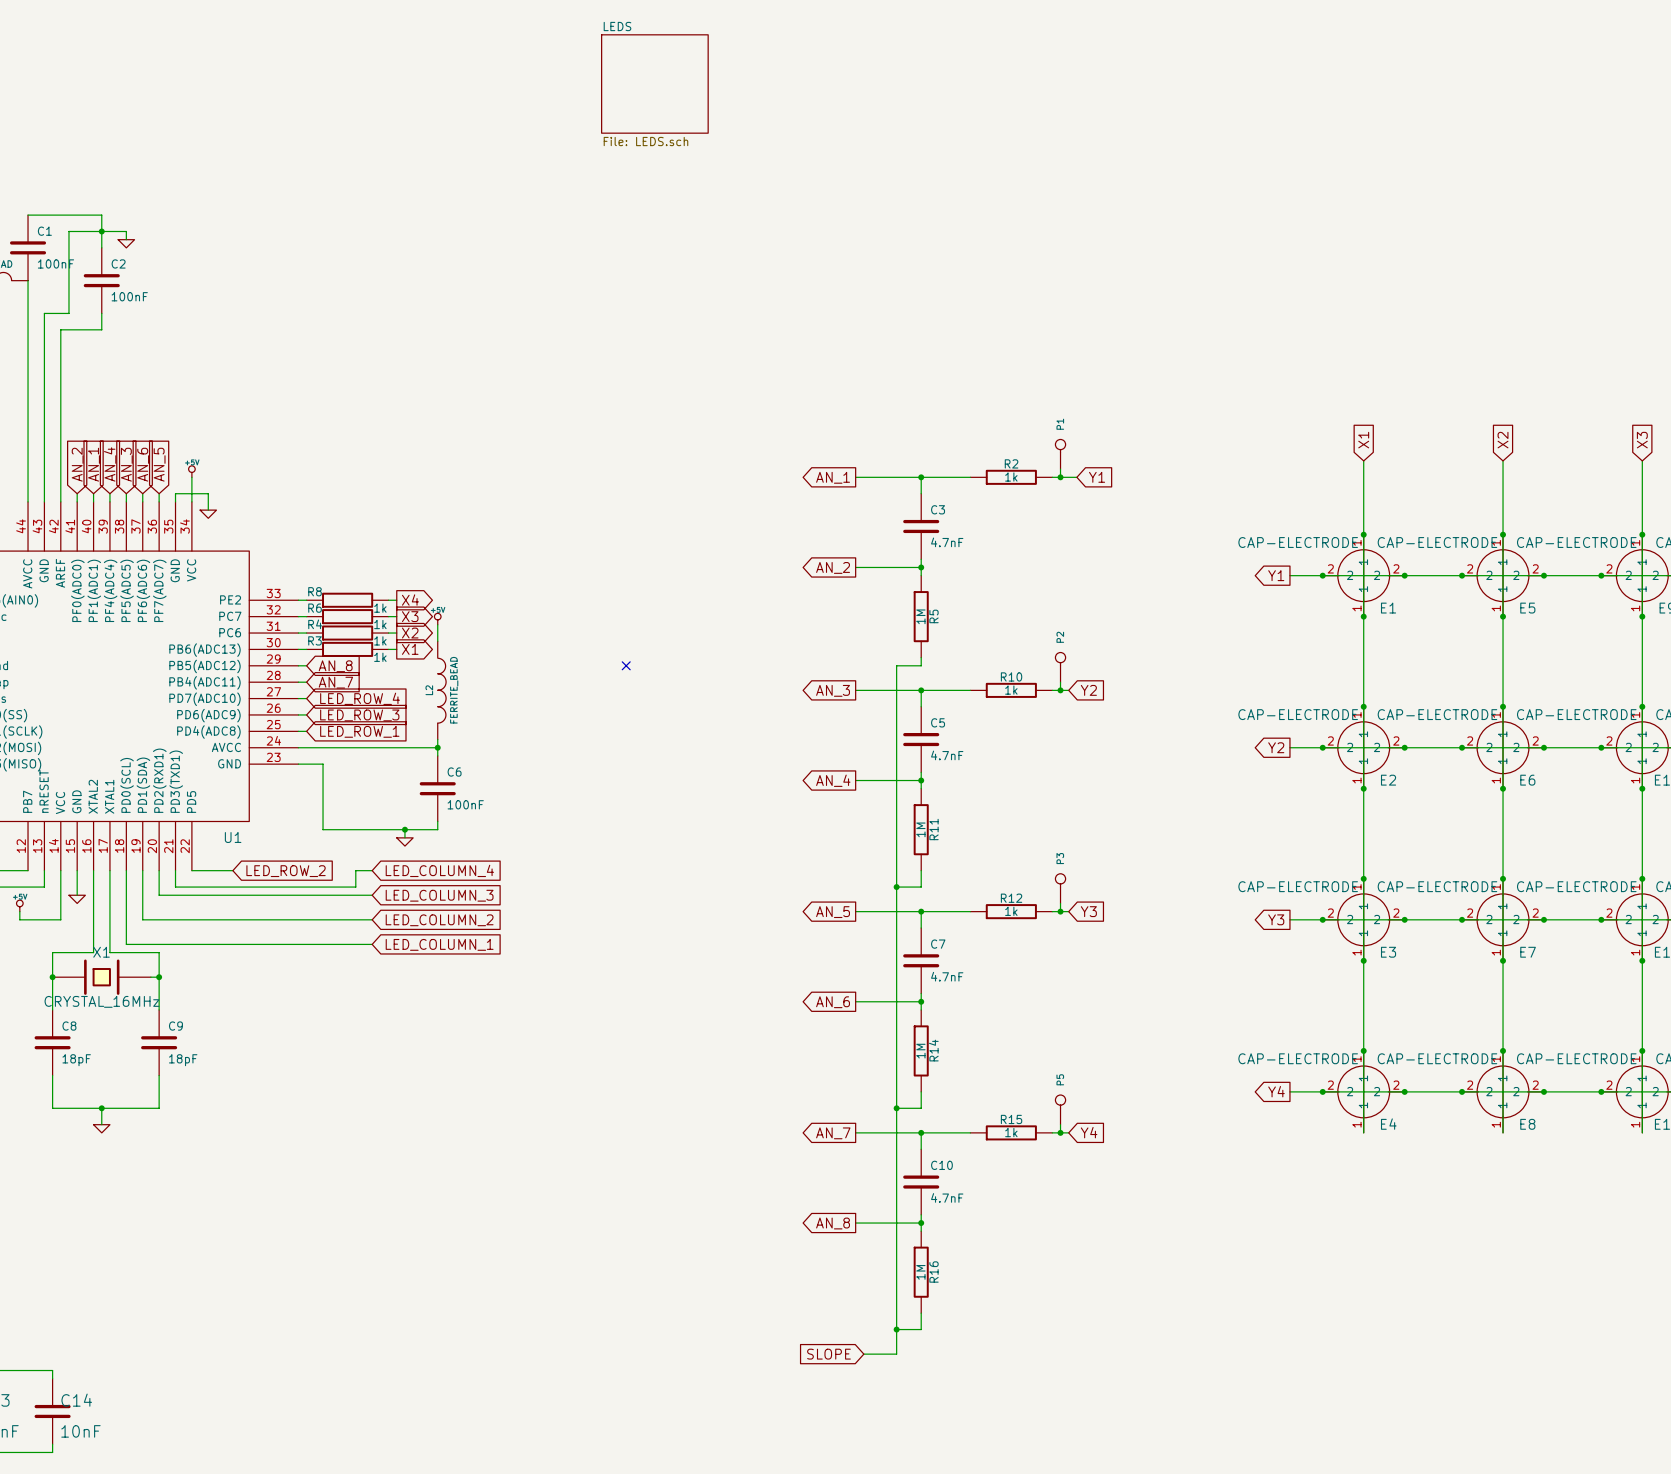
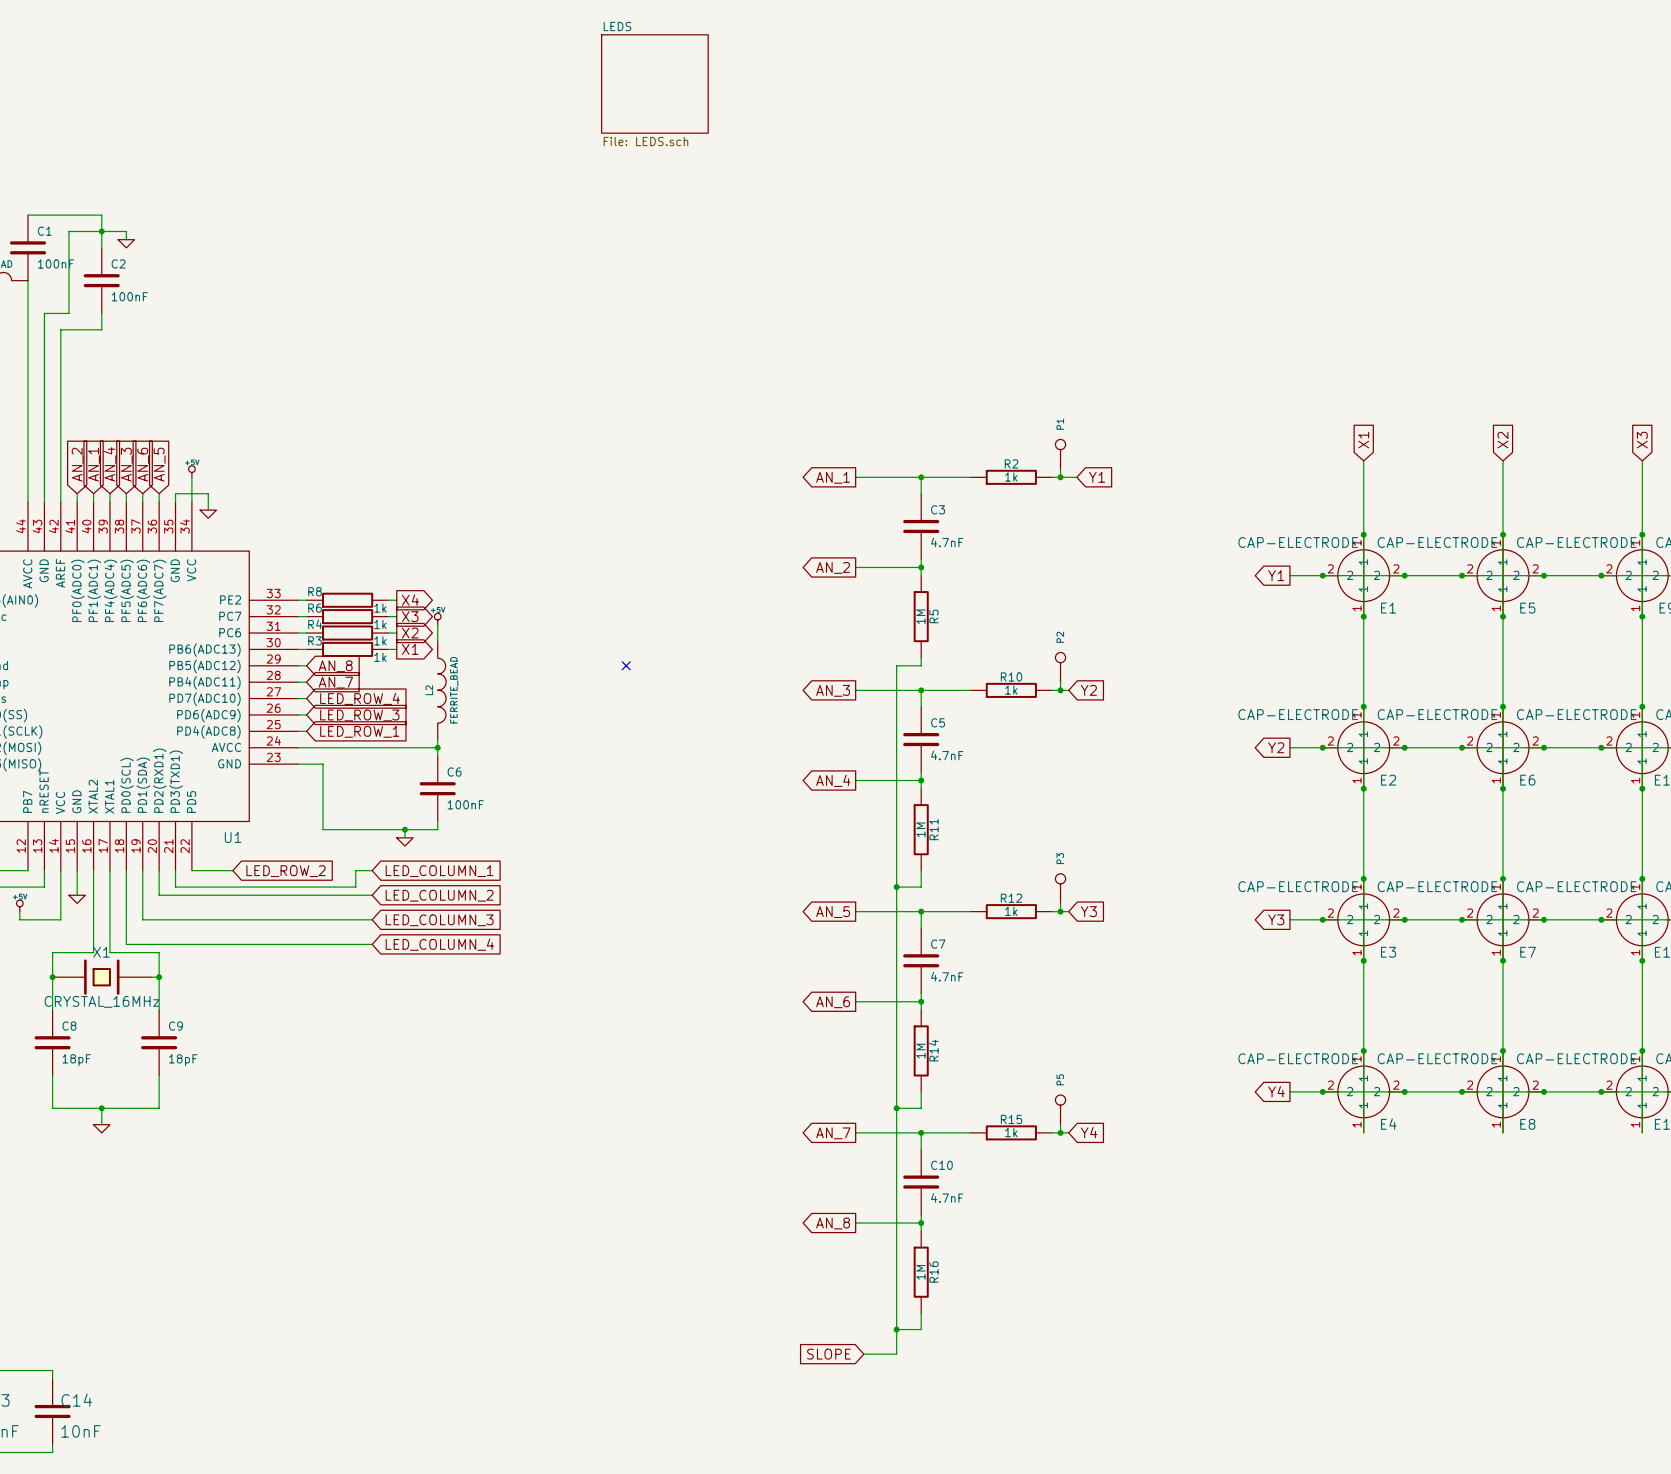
global label: LED_COLUMN_4 (439, 870) -> LED_COLUMN_1 (439, 871)
global label: LED_COLUMN_3 (439, 895) -> LED_COLUMN_2 (439, 895)
global label: LED_COLUMN_2 (439, 920) -> LED_COLUMN_3 (439, 920)
global label: LED_COLUMN_1 (439, 944) -> LED_COLUMN_4 (439, 944)

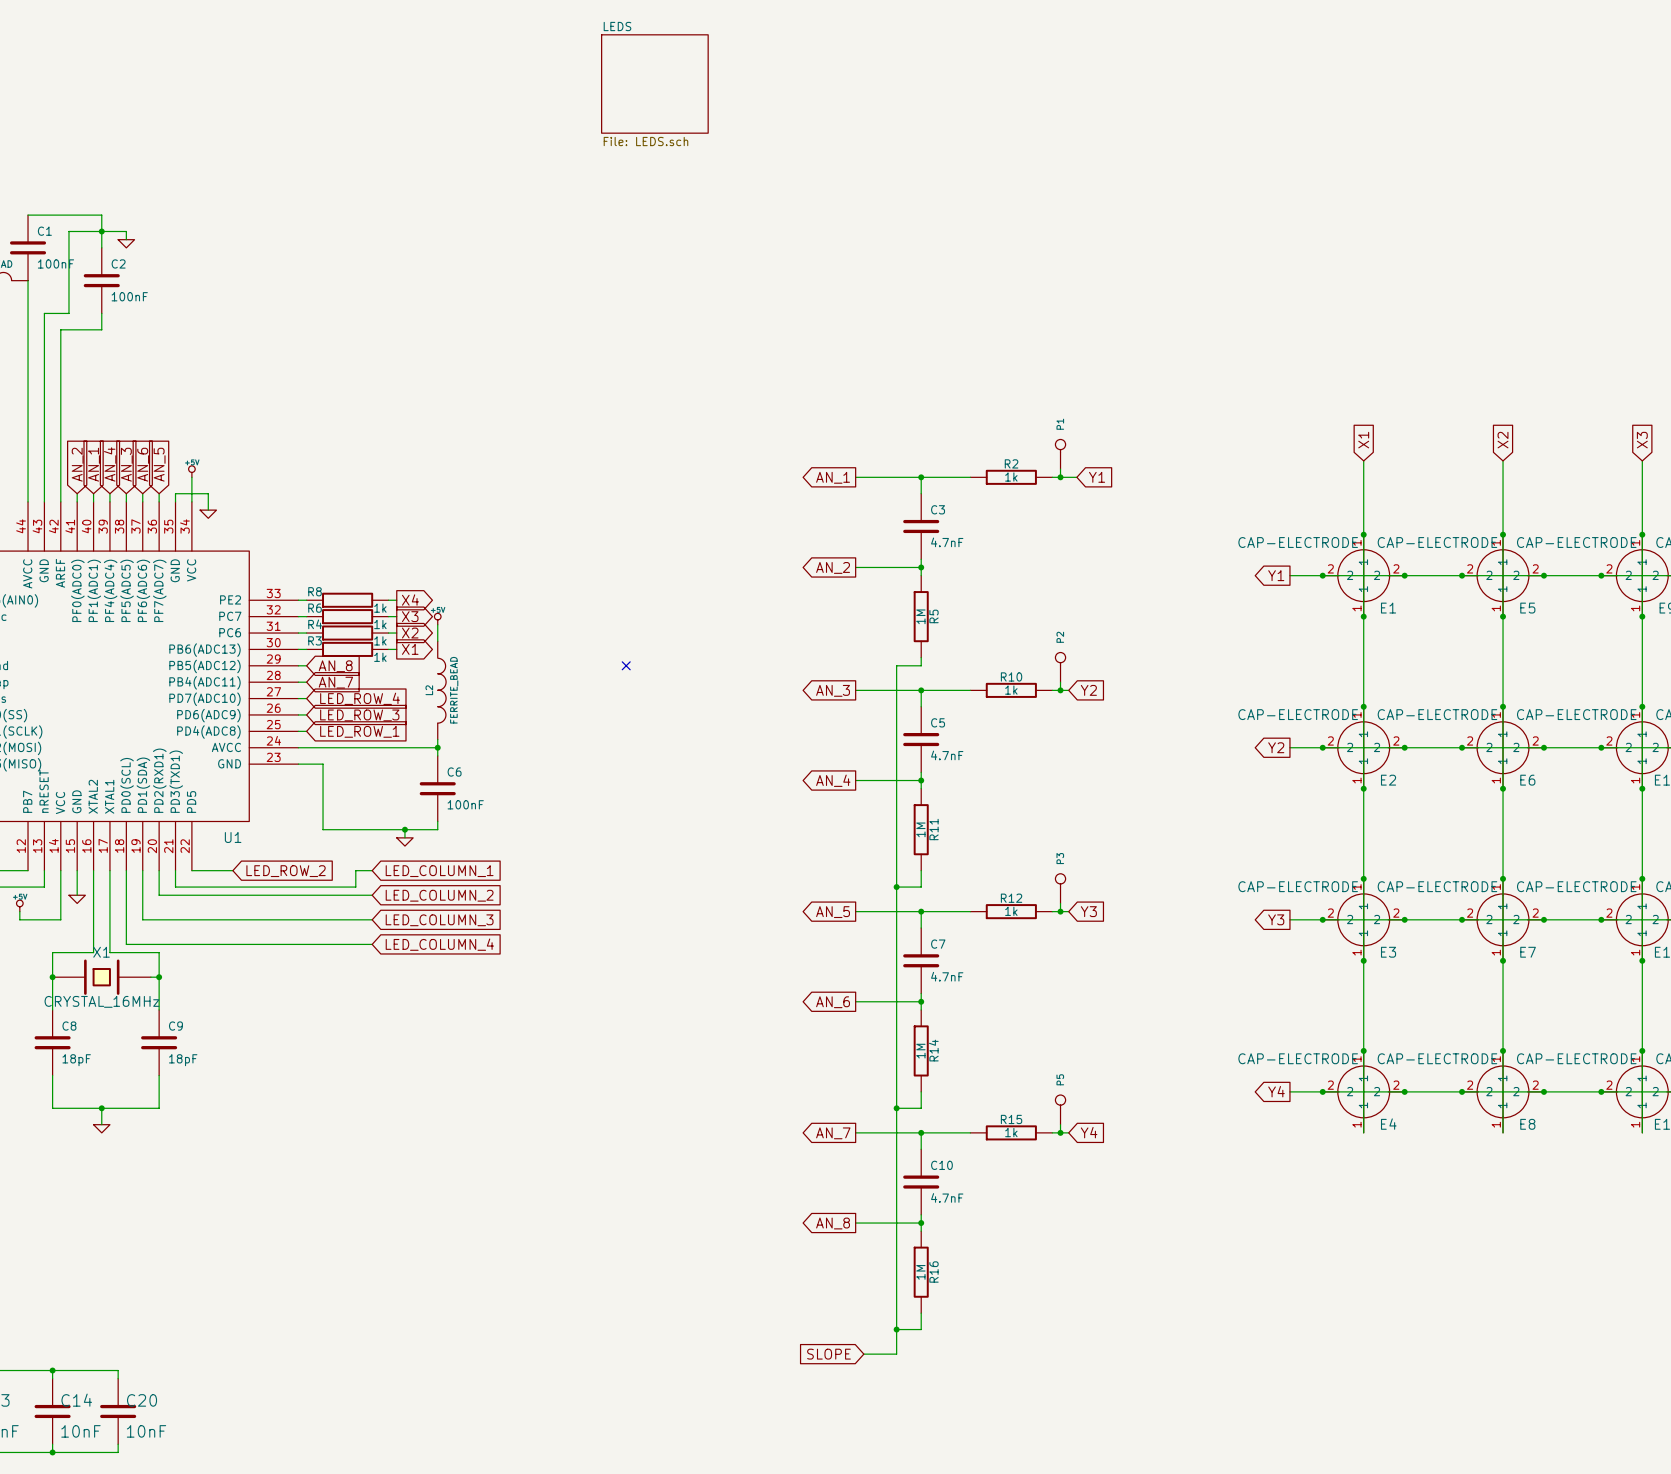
wire: none -> (52, 1370) (118, 1370) (118, 1378)
junction: none -> (52, 1370)
C20: none -> 10nF (118, 1411)
wire: none -> (118, 1444) (118, 1452) (52, 1452)
junction: none -> (52, 1452)

